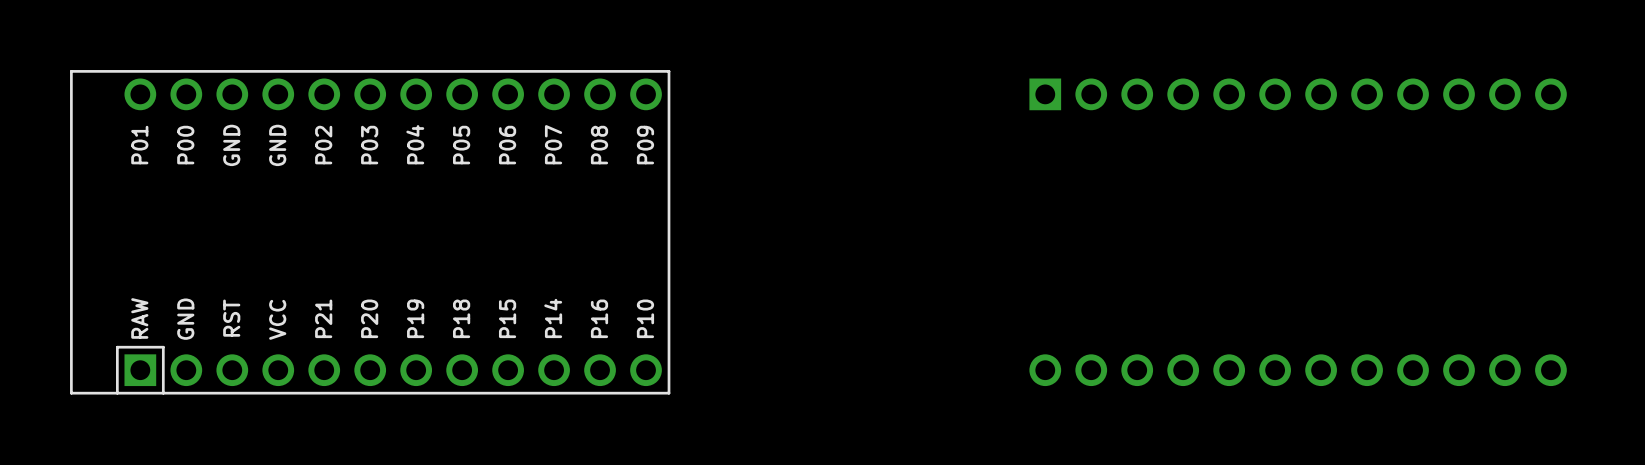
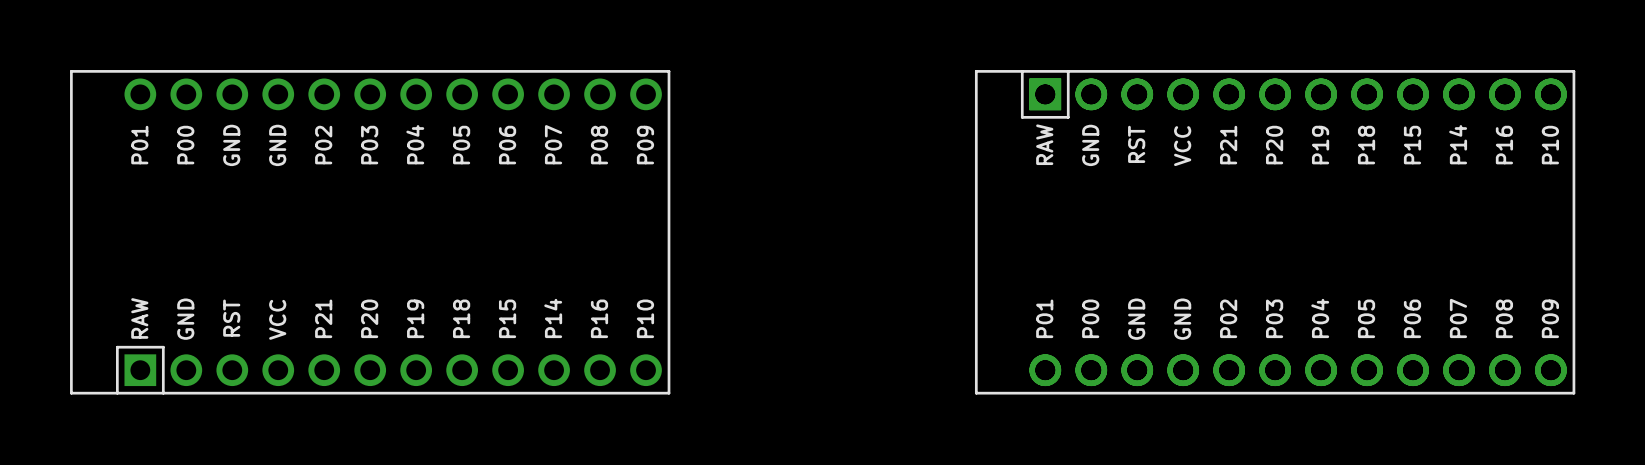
part: none -> (1275, 232)

